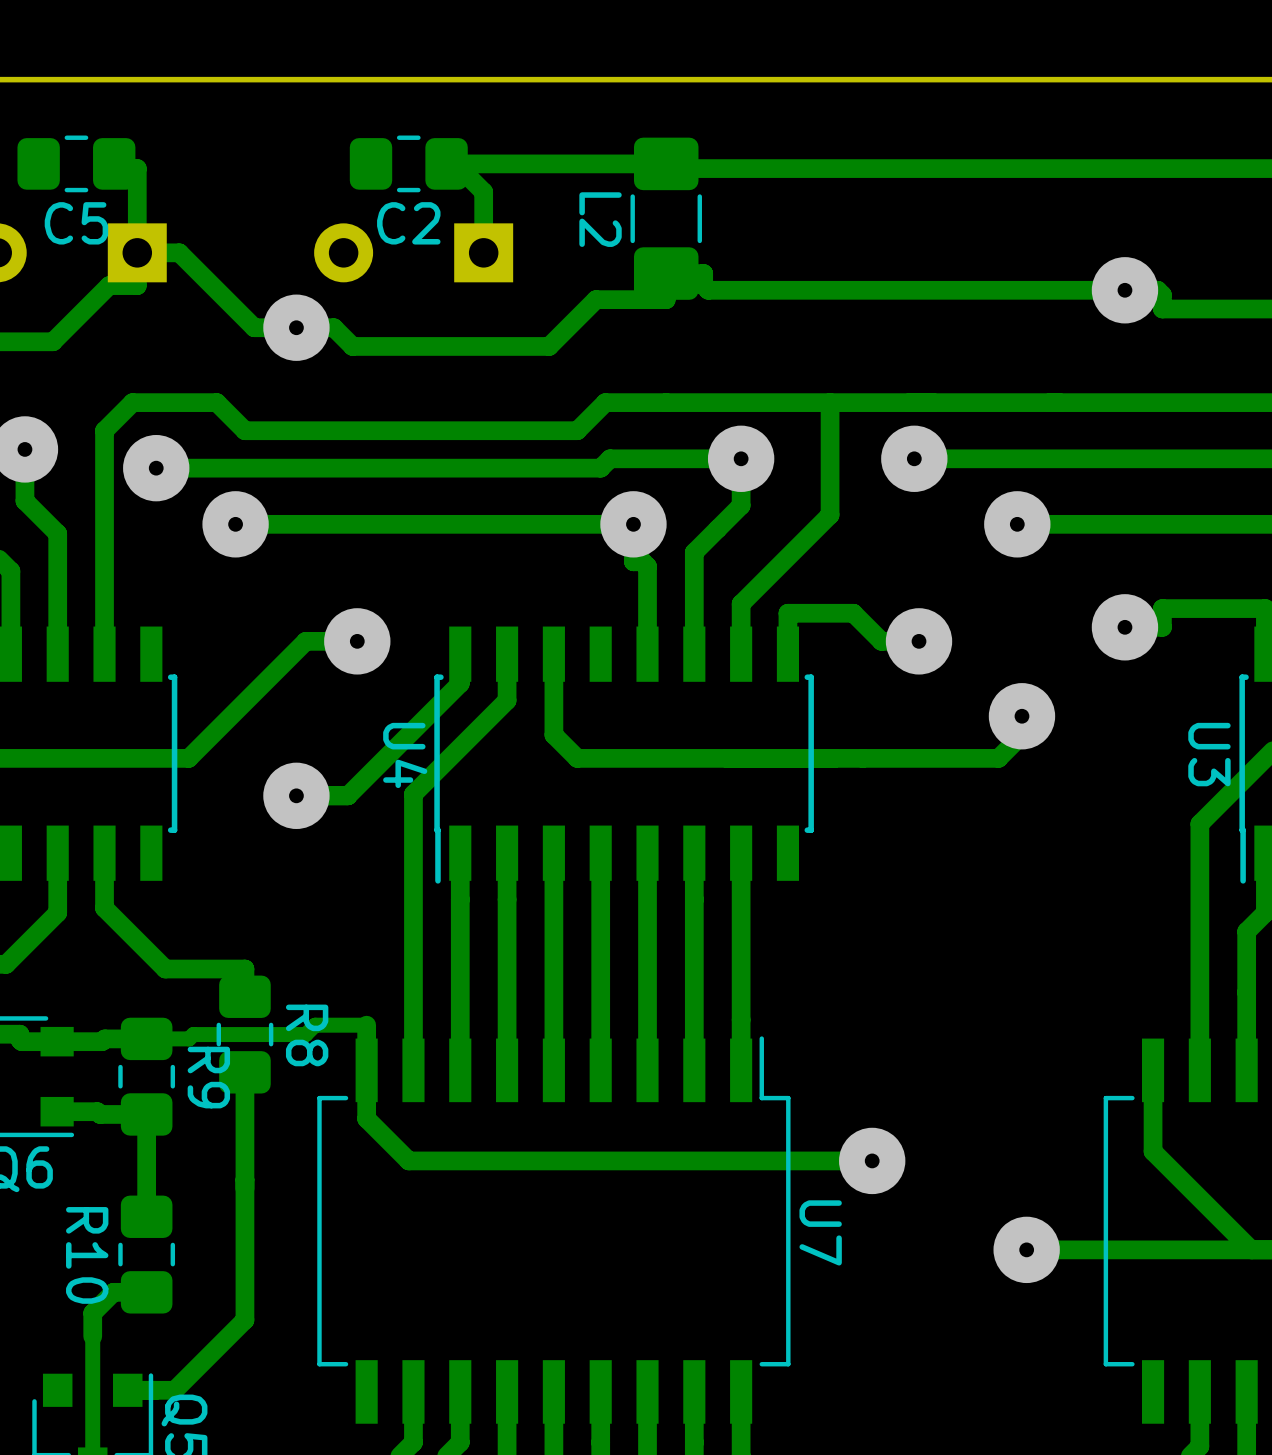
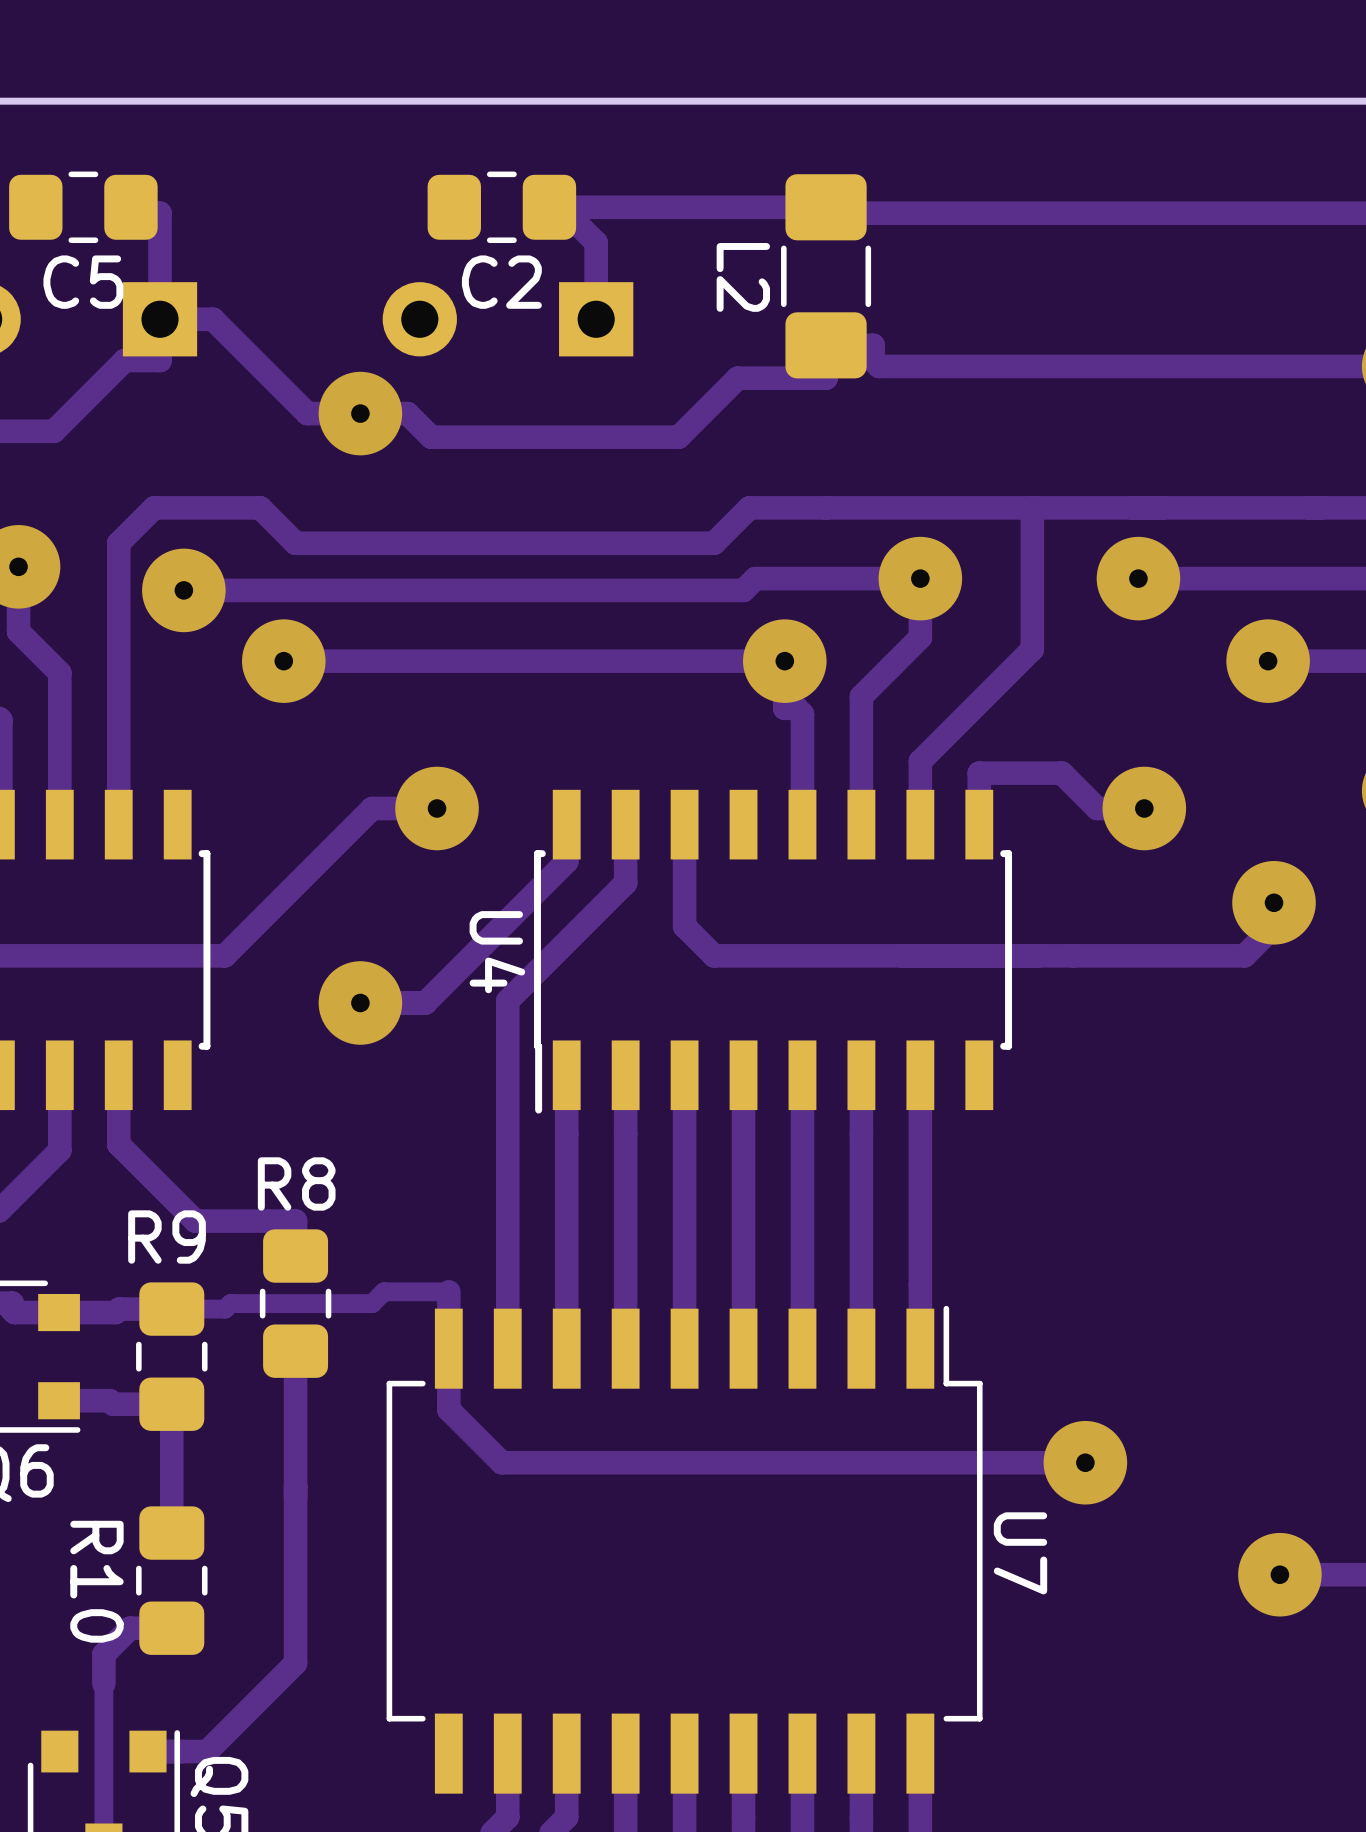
R8 name rotation: 0° (307, 1035) -> 90° counterclockwise (296, 1183)
R8 name position: R8 (307, 1035) -> R8 (296, 1183)
R9 name rotation: 0° (208, 1077) -> 90° counterclockwise (167, 1237)
R9 name position: R9 (208, 1077) -> R9 (167, 1237)

